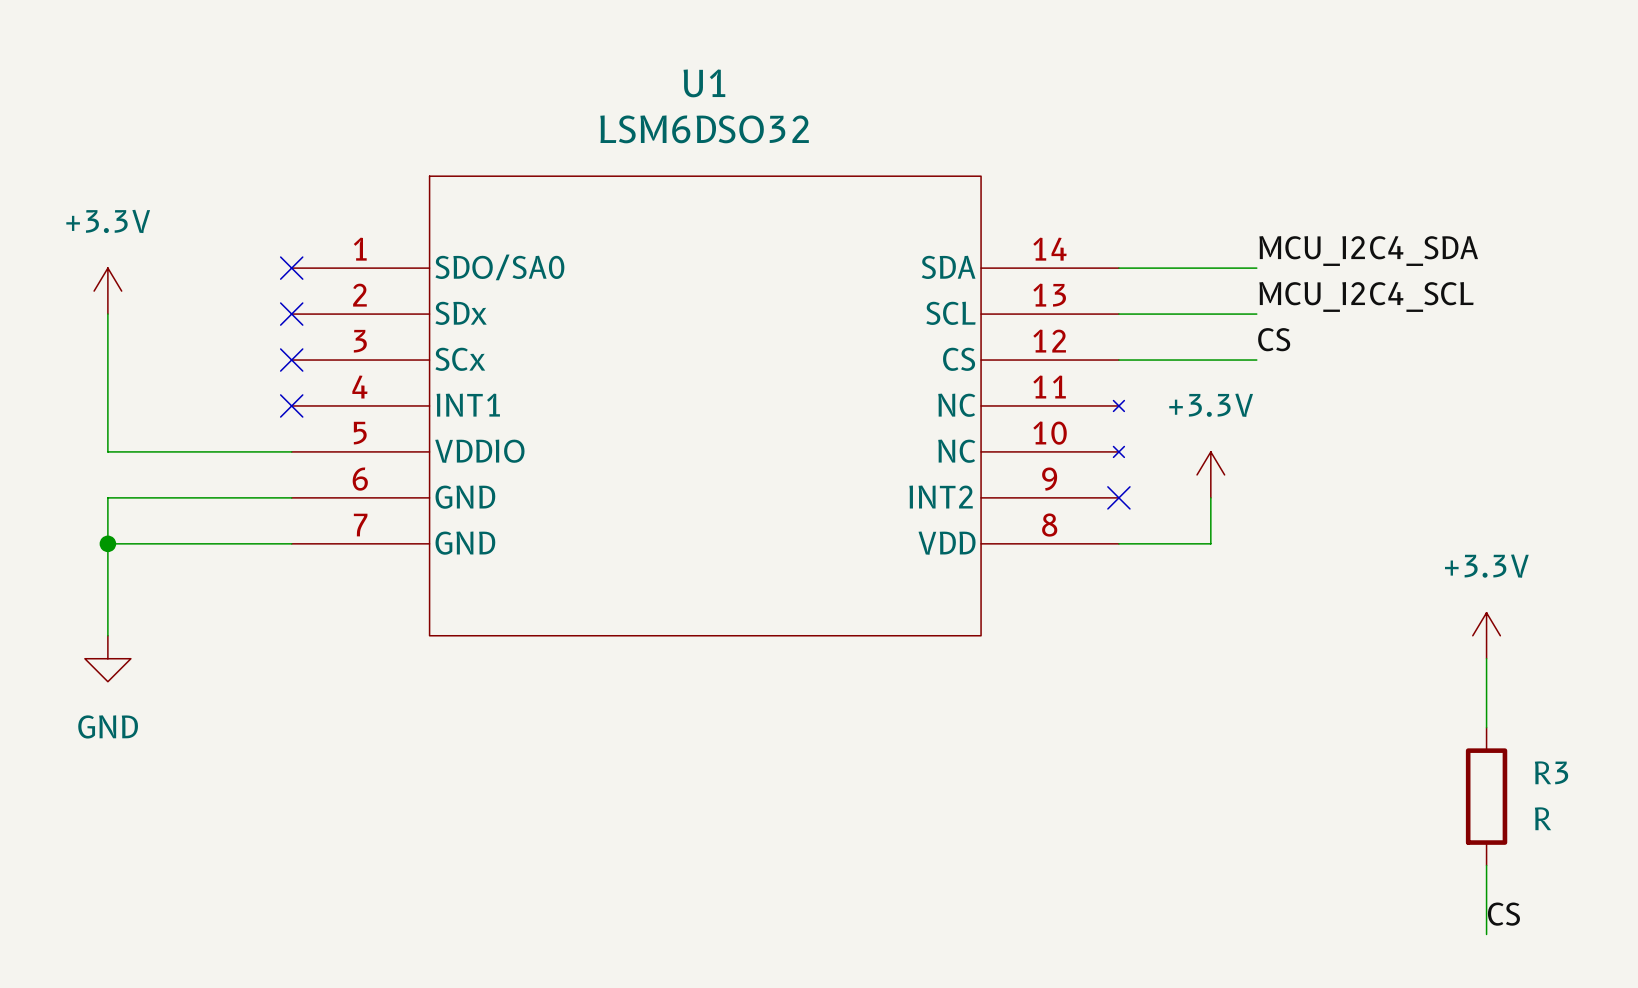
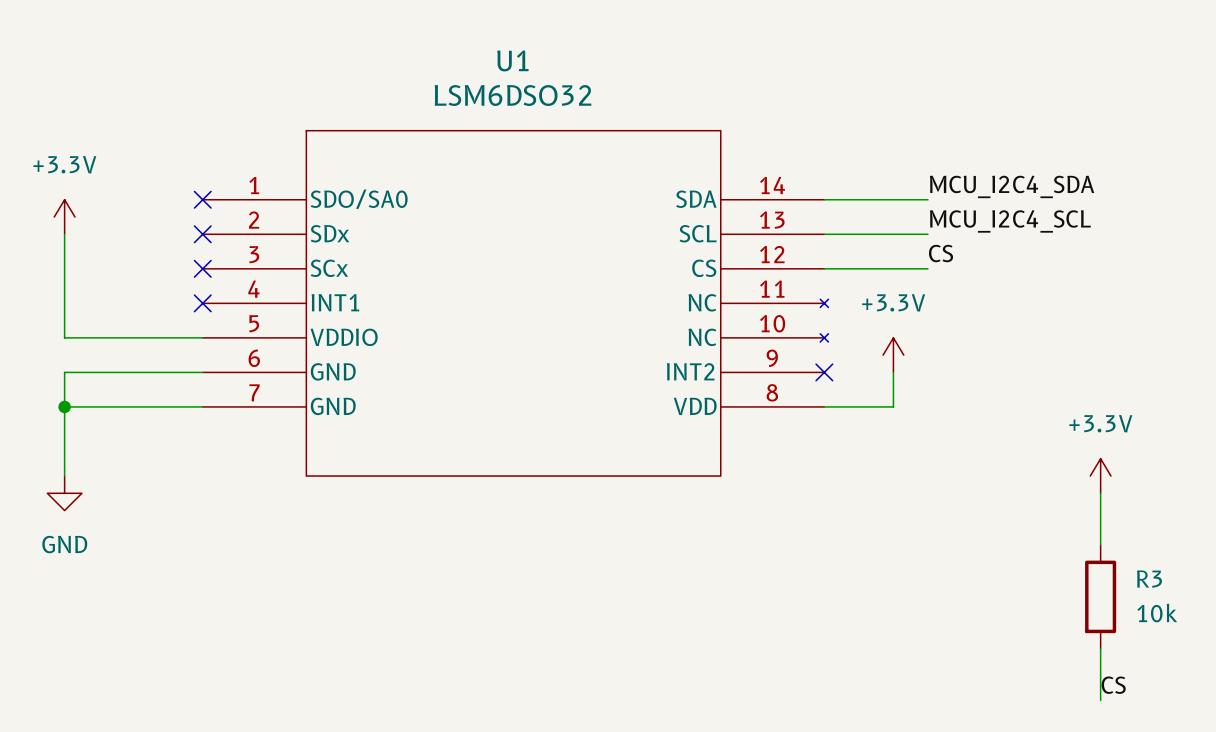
R3 value: R (1543, 818) -> 10k (1157, 613)

